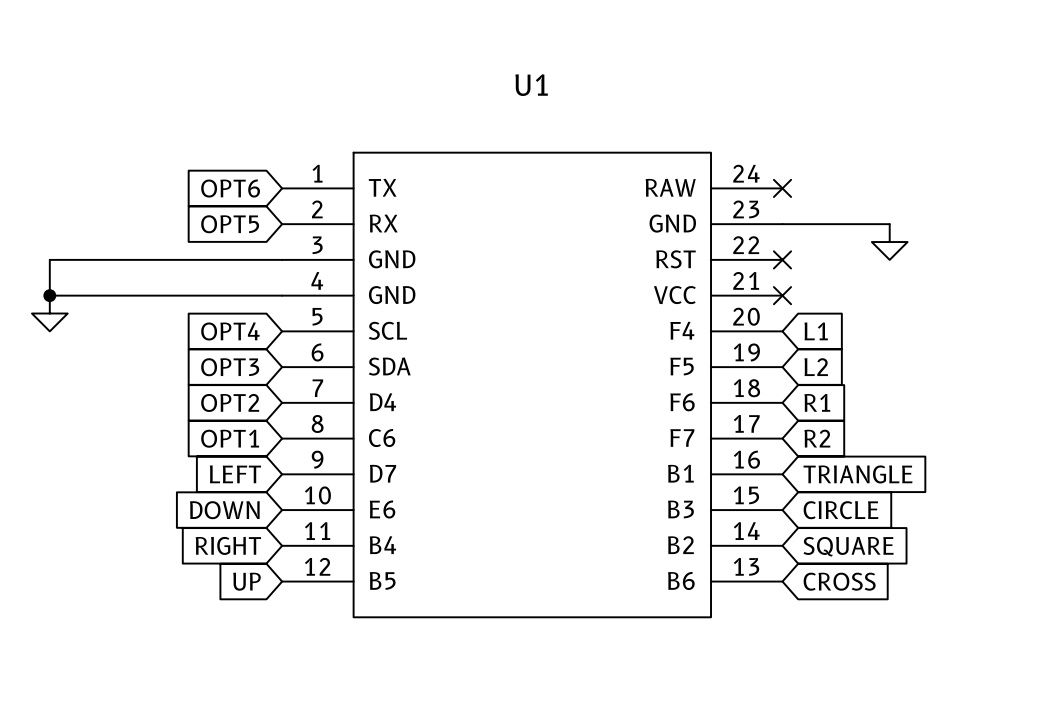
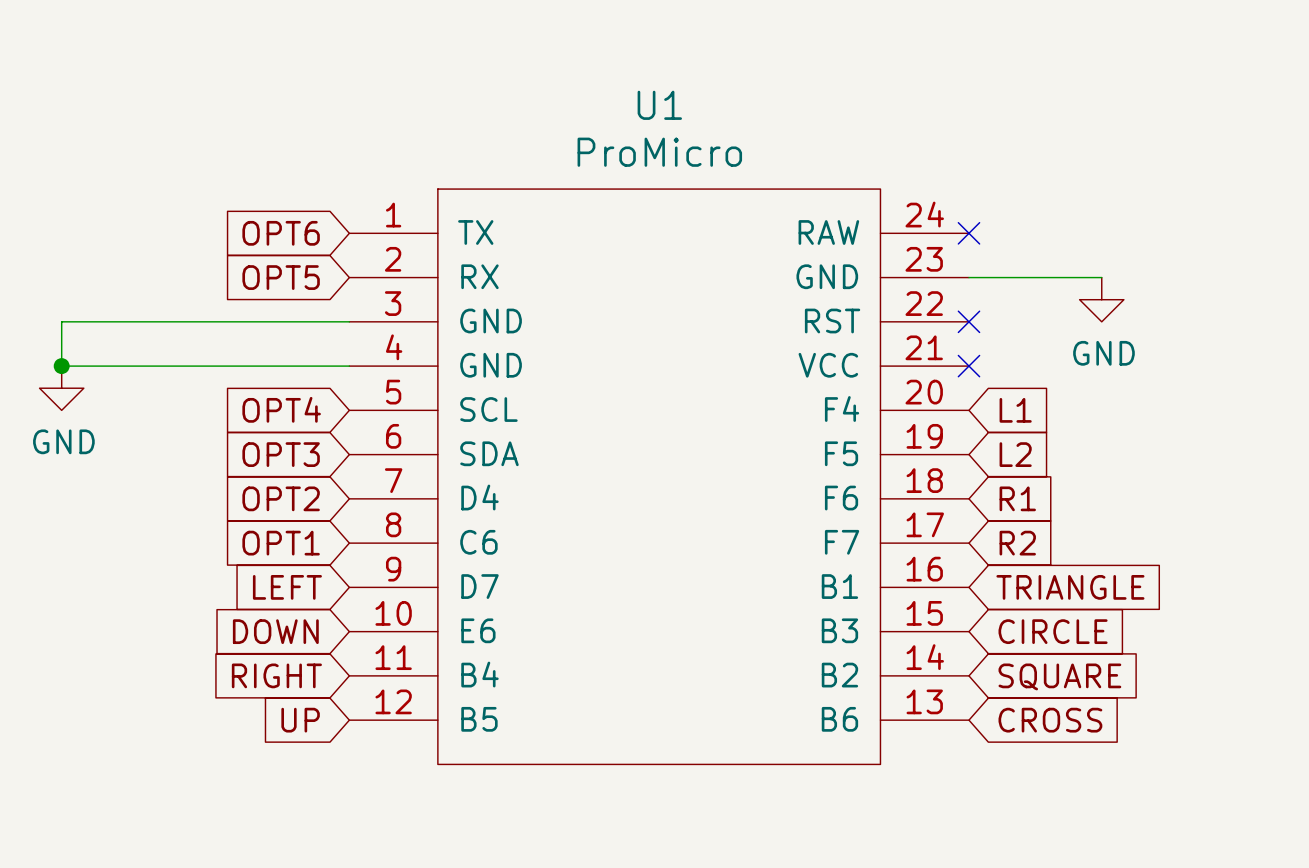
U1 value: none -> ProMicro (659, 152)
power symbol text: none -> GND (1103, 353)
power symbol text: none -> GND (63, 441)

